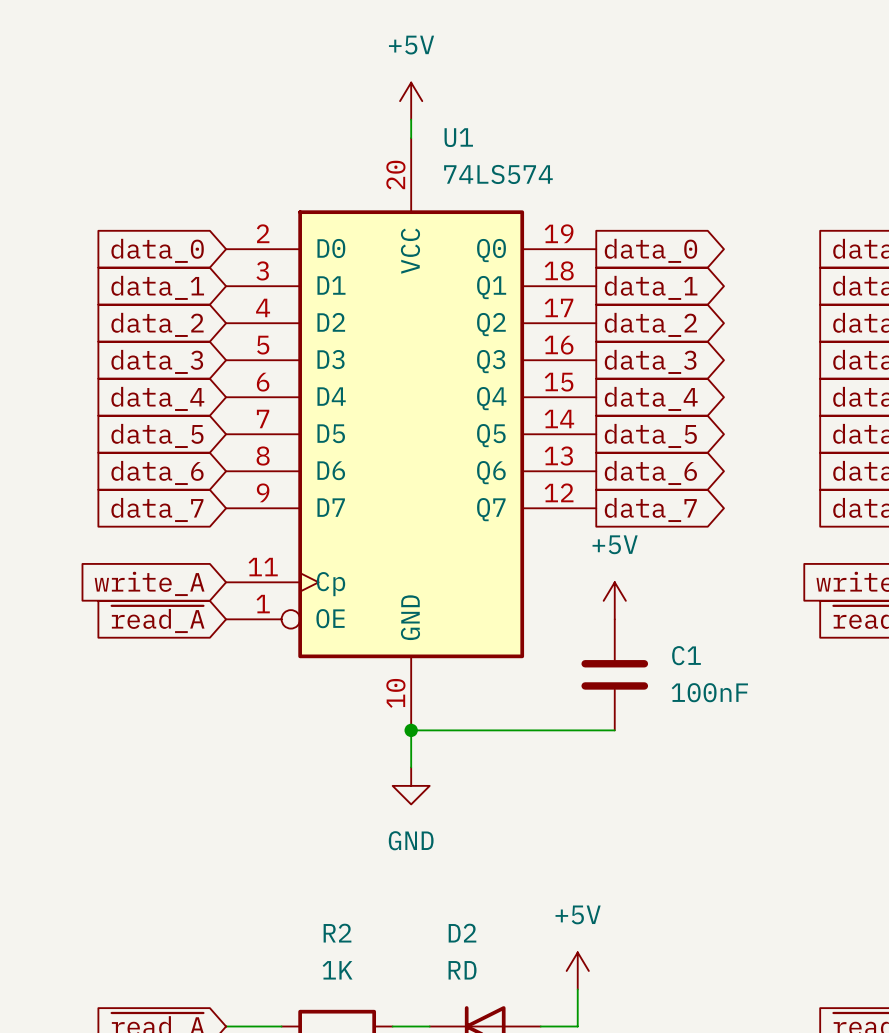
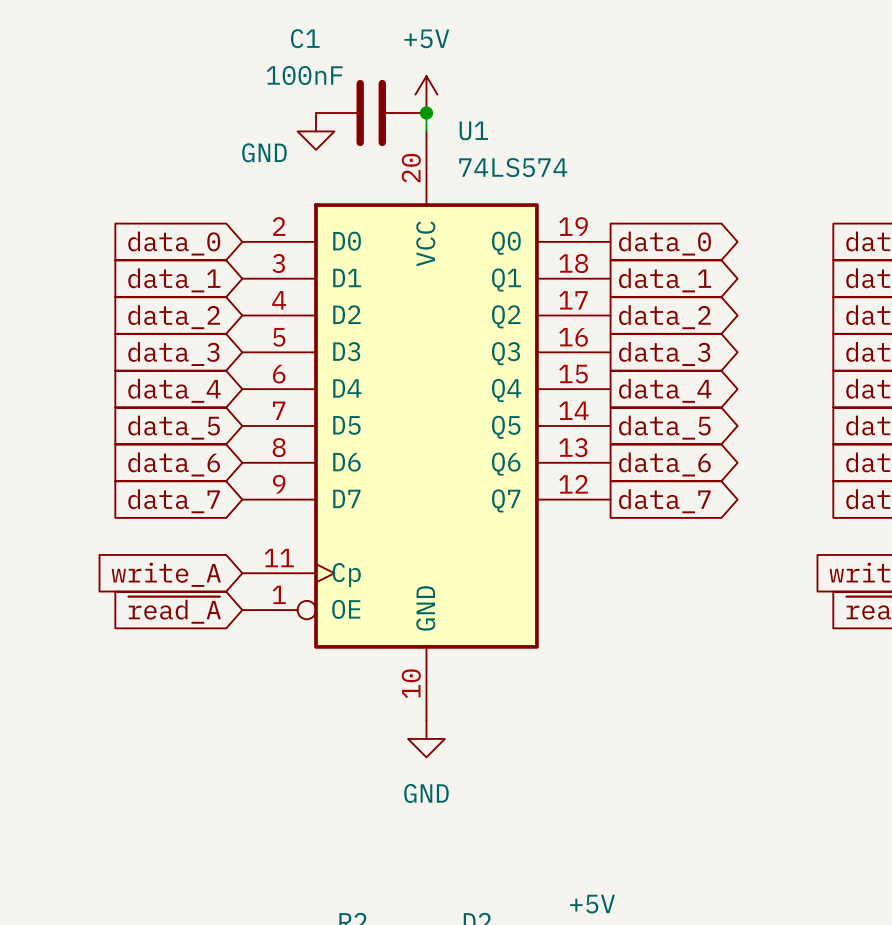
junction: none -> (426, 113)
power symbol: none -> GND (316, 131)
power symbol: +5V (614, 600) -> none
C1 name position: C1 (686, 655) -> C1 (305, 38)
C1 rotation: 0° (614, 674) -> 90° clockwise (371, 113)
C1 position: (614, 674) -> (371, 113)
C1 value position: 100nF (709, 692) -> 100nF (304, 75)
junction: (411, 730) -> none
wire: (614, 730) (411, 730) (411, 767) -> none
power symbol position: GND (411, 785) -> GND (426, 738)

